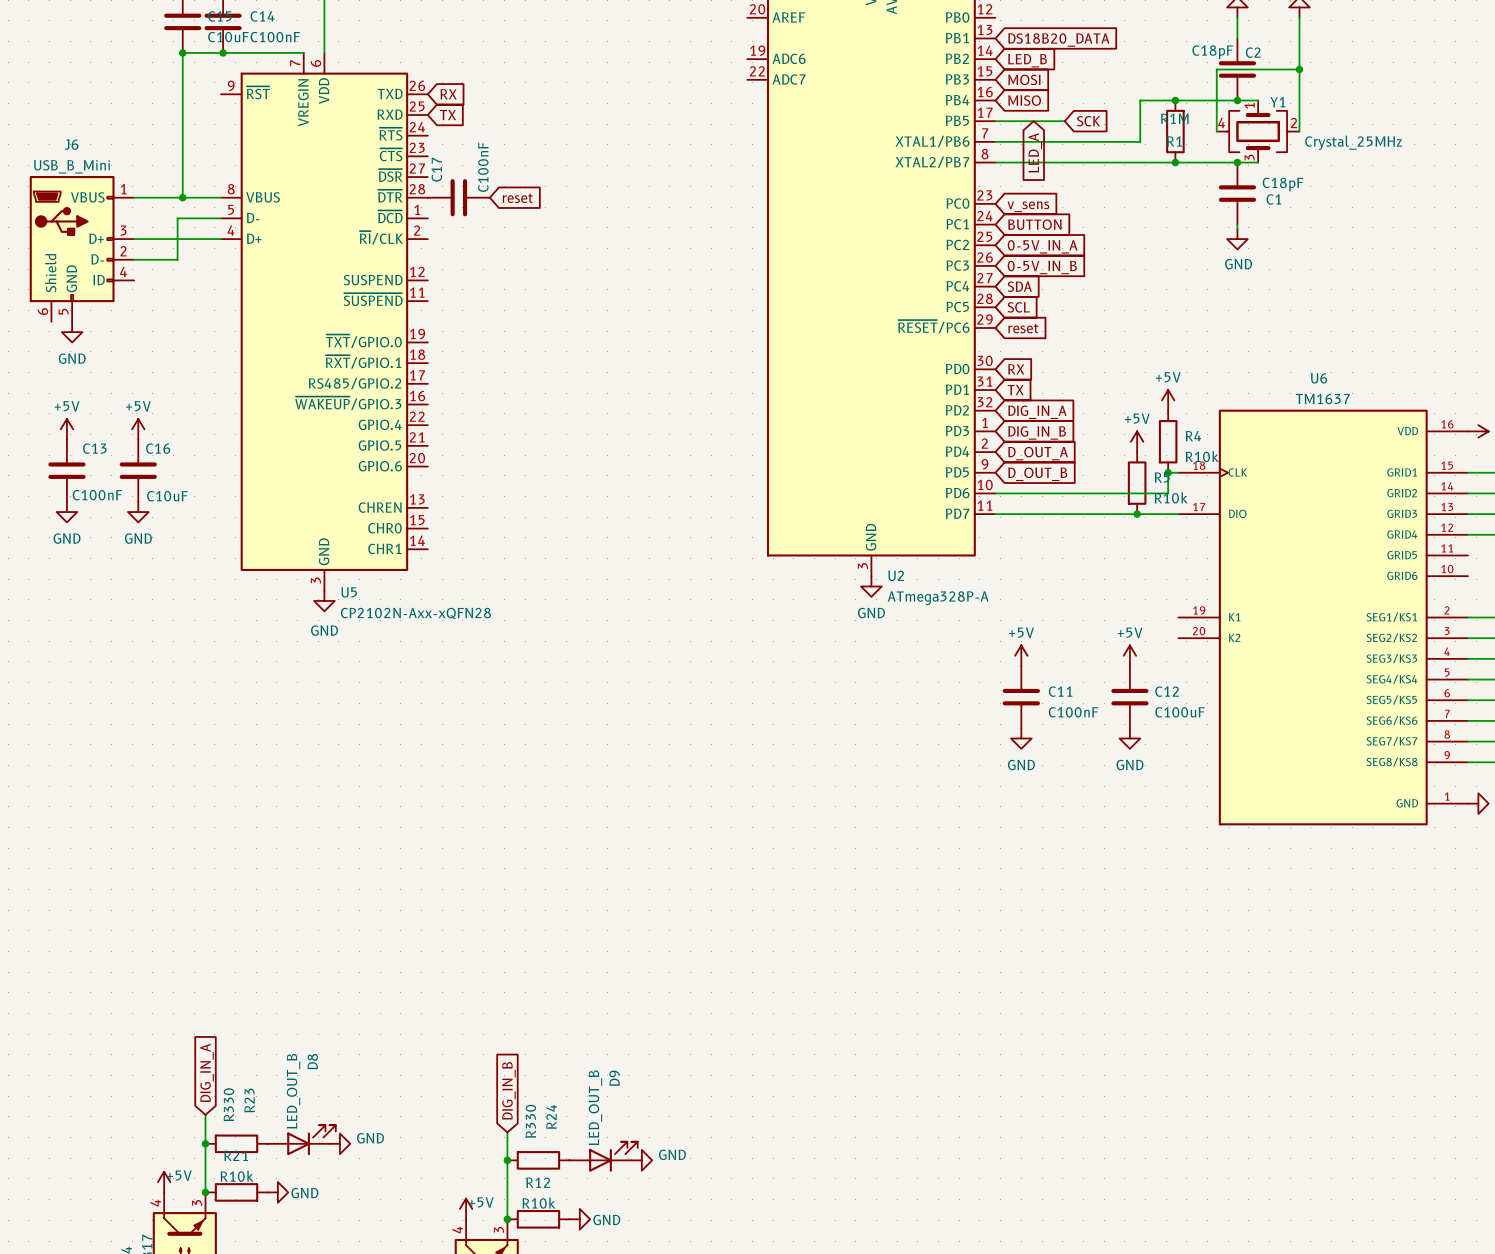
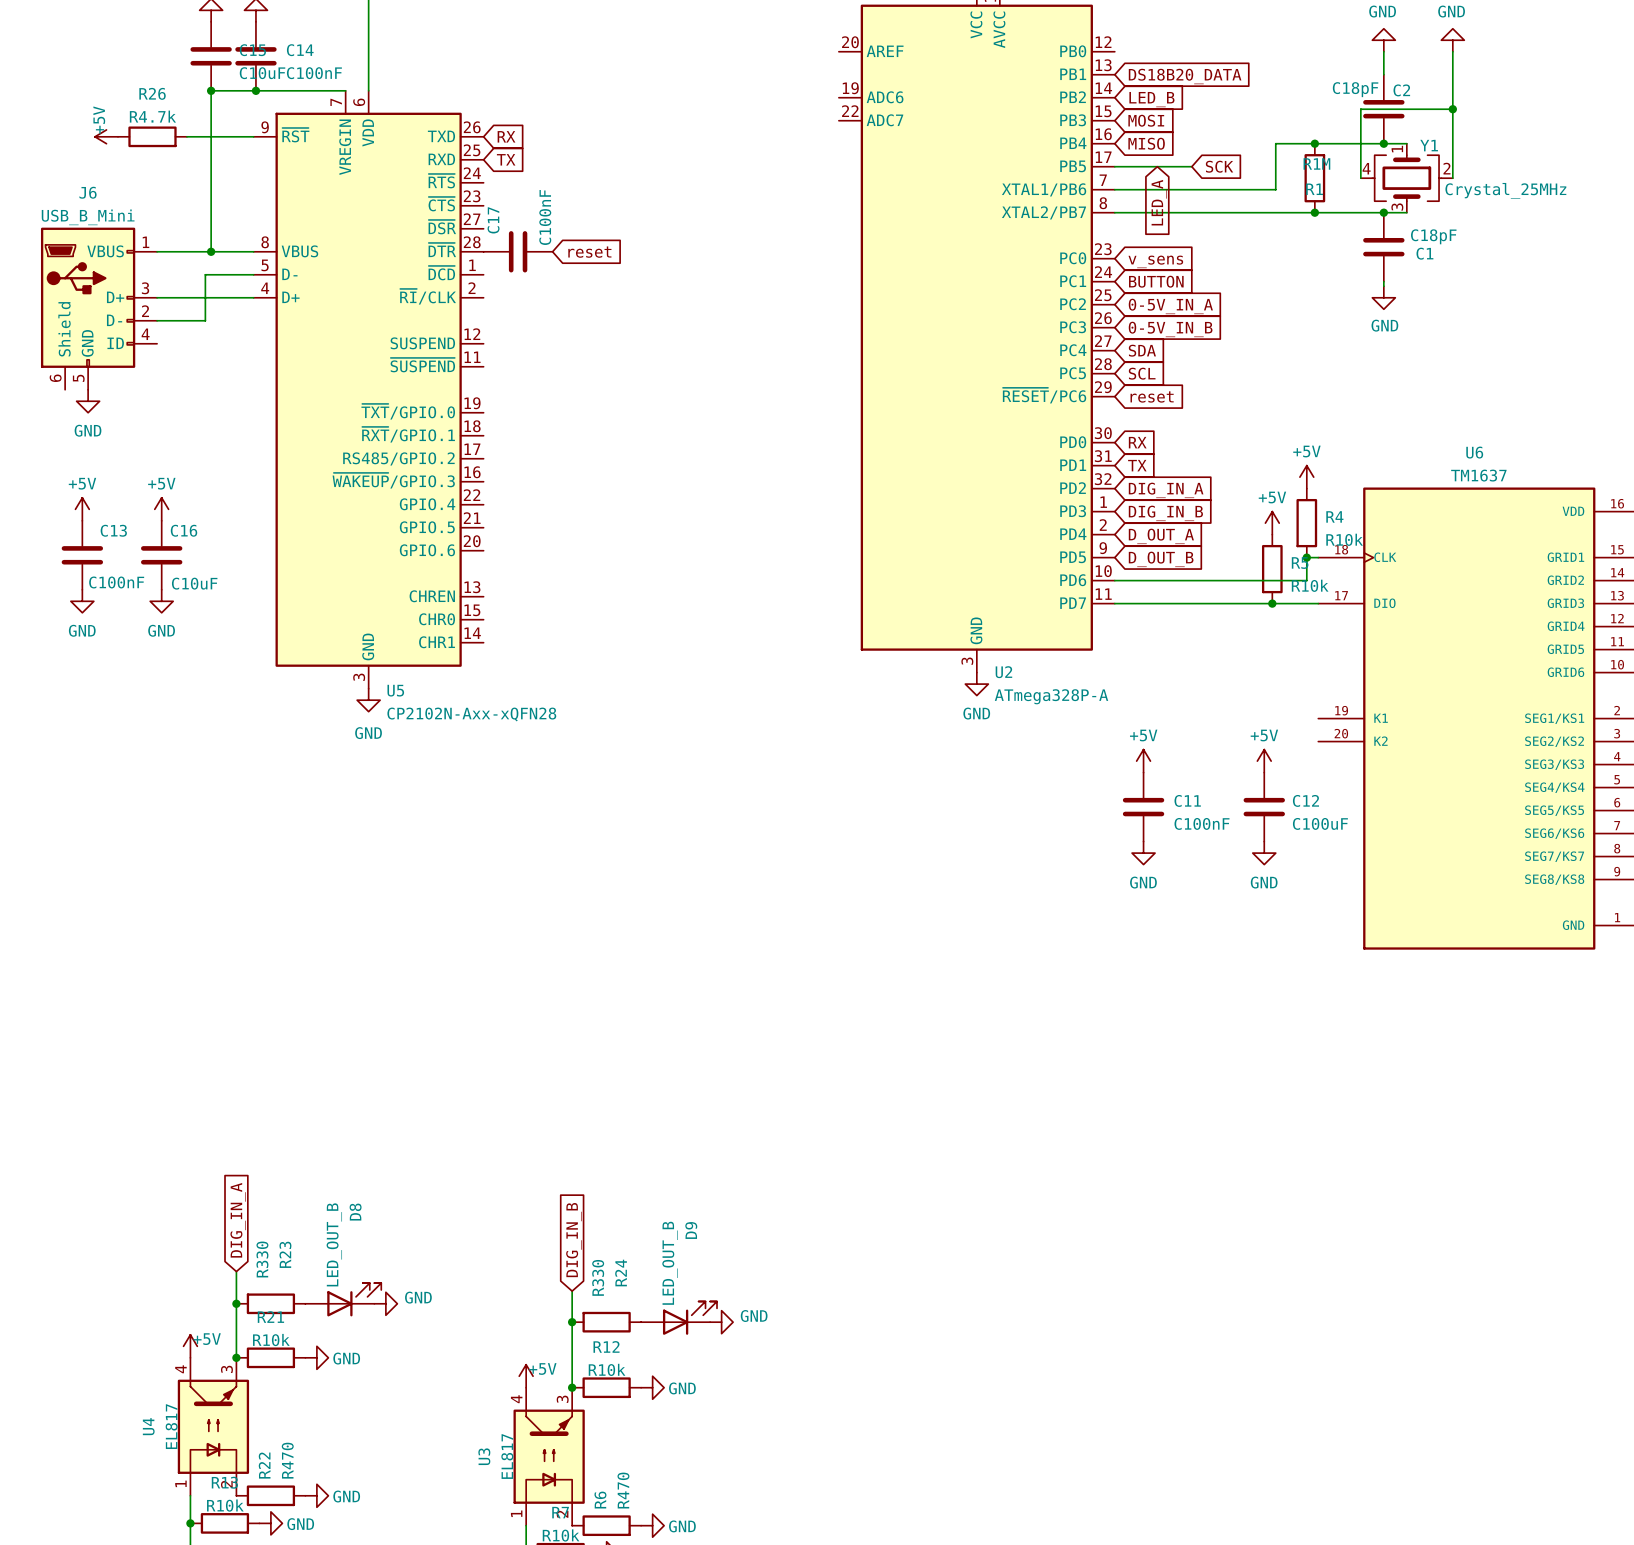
power symbol: none -> +5V (106, 136)
R26: none -> R4.7k (152, 136)
wire: none -> (186, 136) (253, 136)

